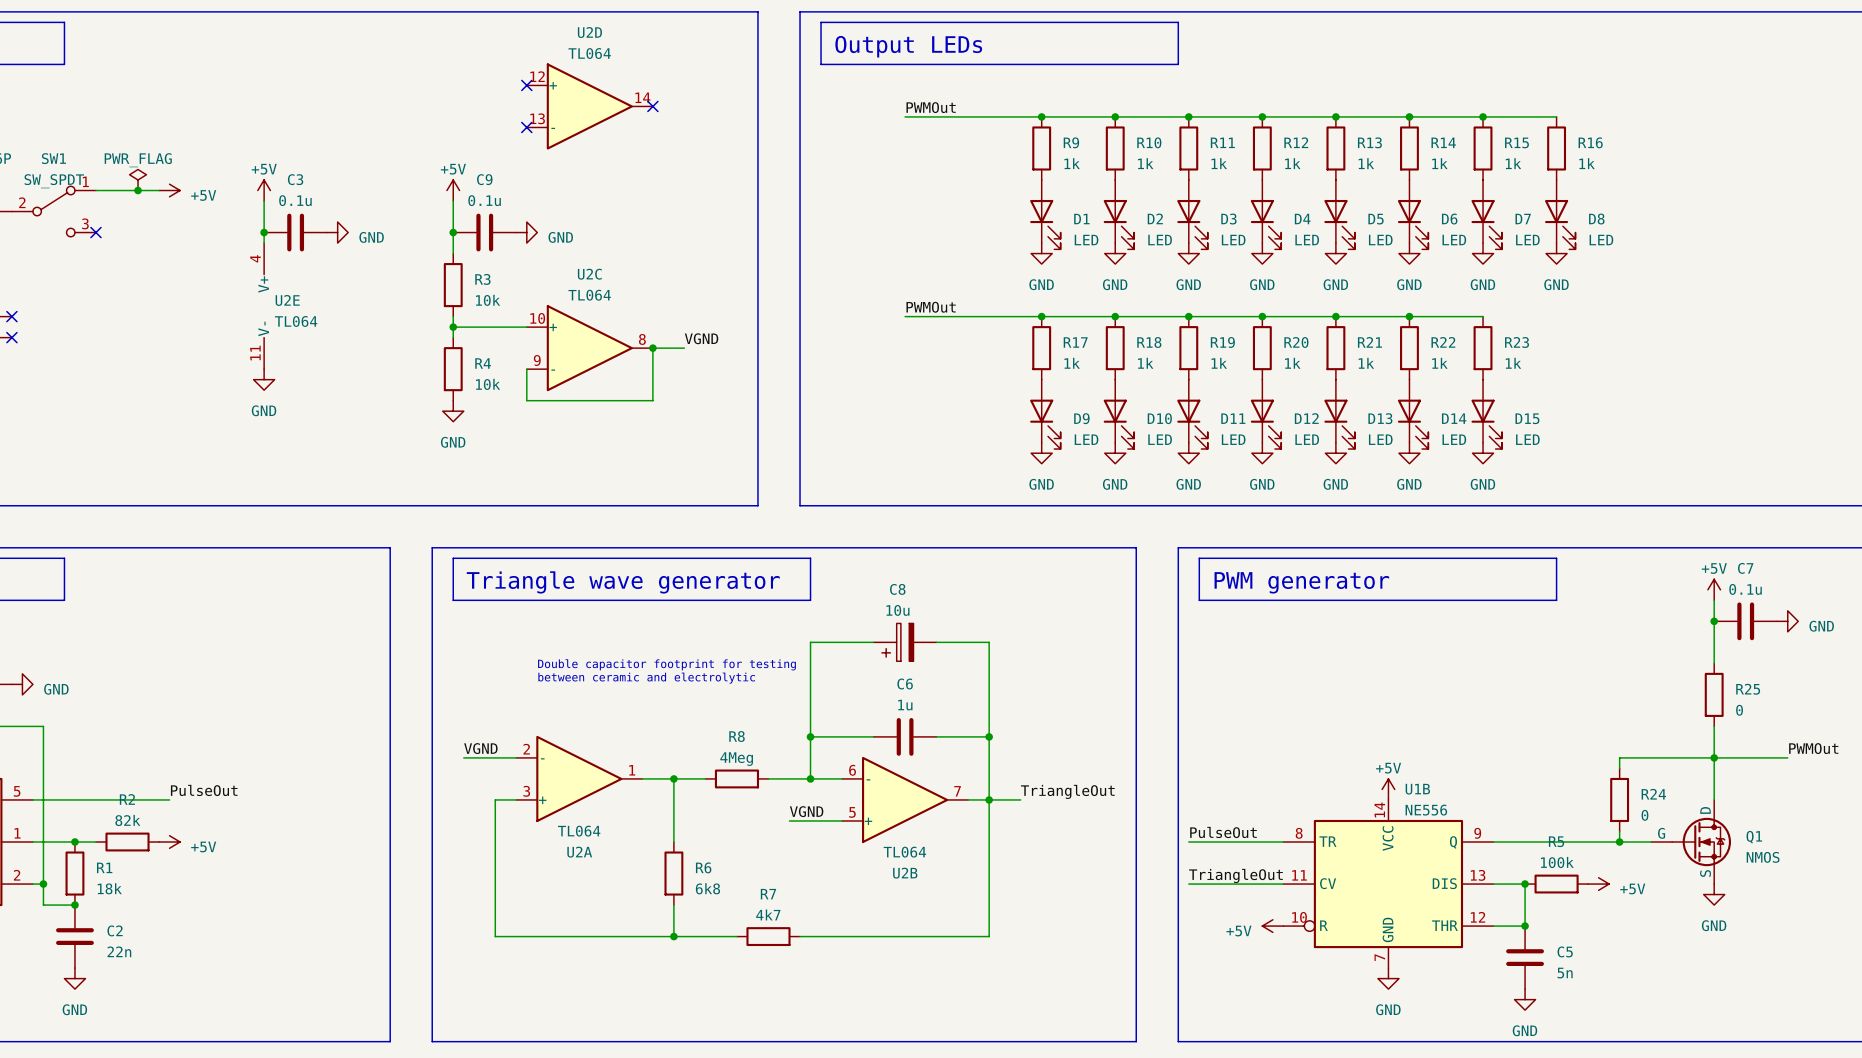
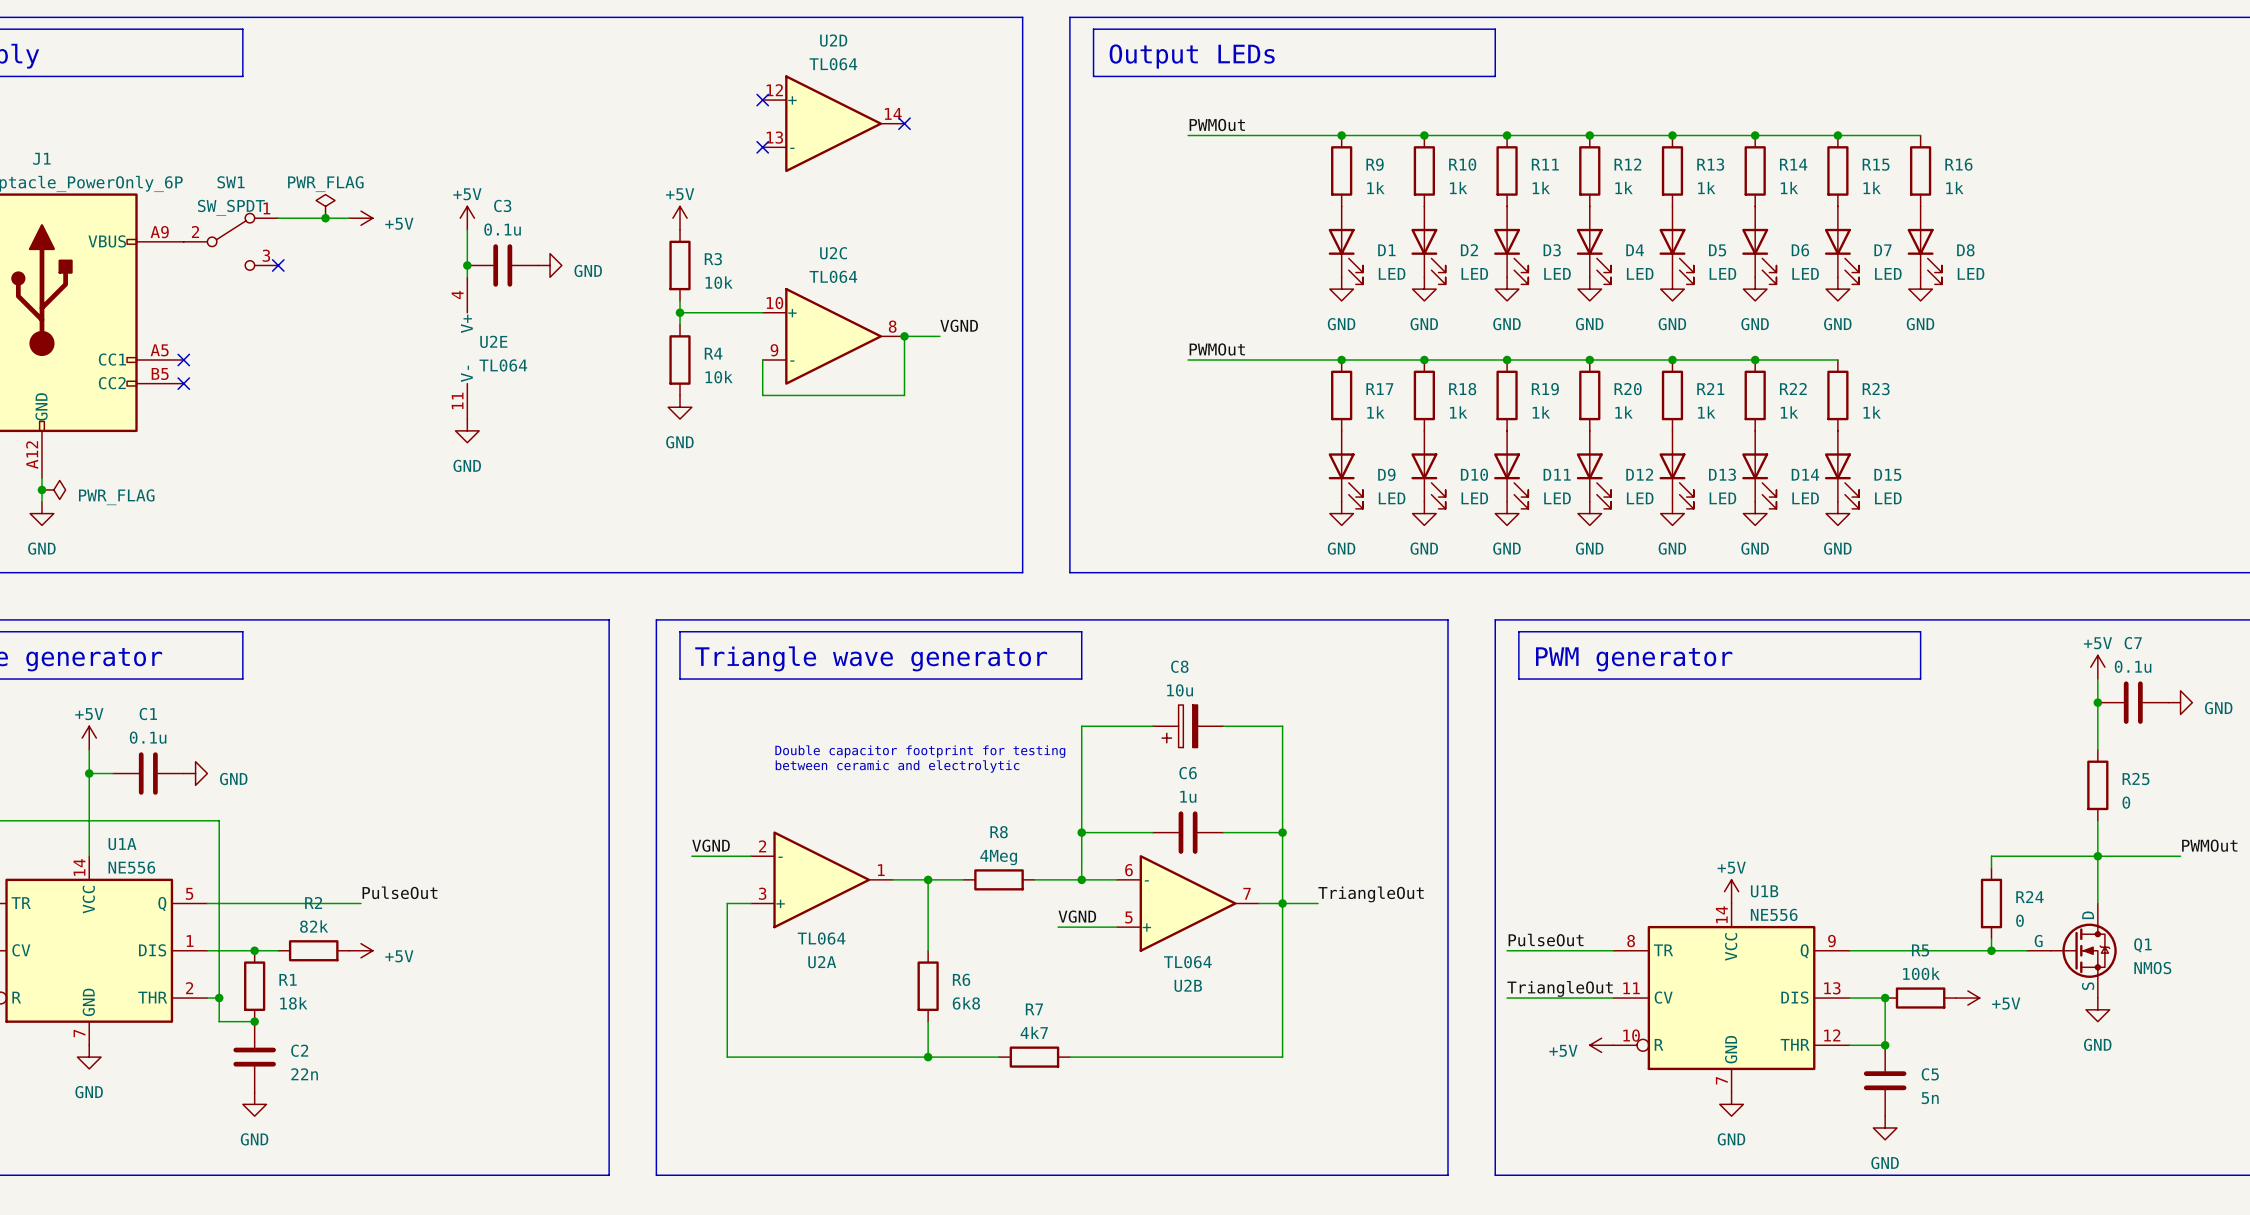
wire: (453, 201) (453, 253) -> none
junction: (453, 232) -> none
C9: 0.1u (484, 232) -> none
power symbol: GND (526, 232) -> none
junction: none -> (680, 312)
R3 position: (453, 285) -> (680, 265)
junction: none -> (904, 336)
wire: (453, 316) (453, 337) -> (680, 300) (680, 324)
wire: (453, 327) (526, 327) -> (680, 312) (762, 312)
junction: (453, 327) -> none
label position: VGND (701, 338) -> VGND (959, 325)
U2C position: (589, 348) -> (833, 336)
junction: (652, 348) -> none
wire: (684, 348) (652, 348) (652, 400) (526, 400) (526, 369) -> (939, 336) (904, 336) (904, 395) (762, 395) (762, 360)
R4 position: (453, 369) -> (680, 360)
power symbol position: GND (453, 411) -> GND (680, 407)

